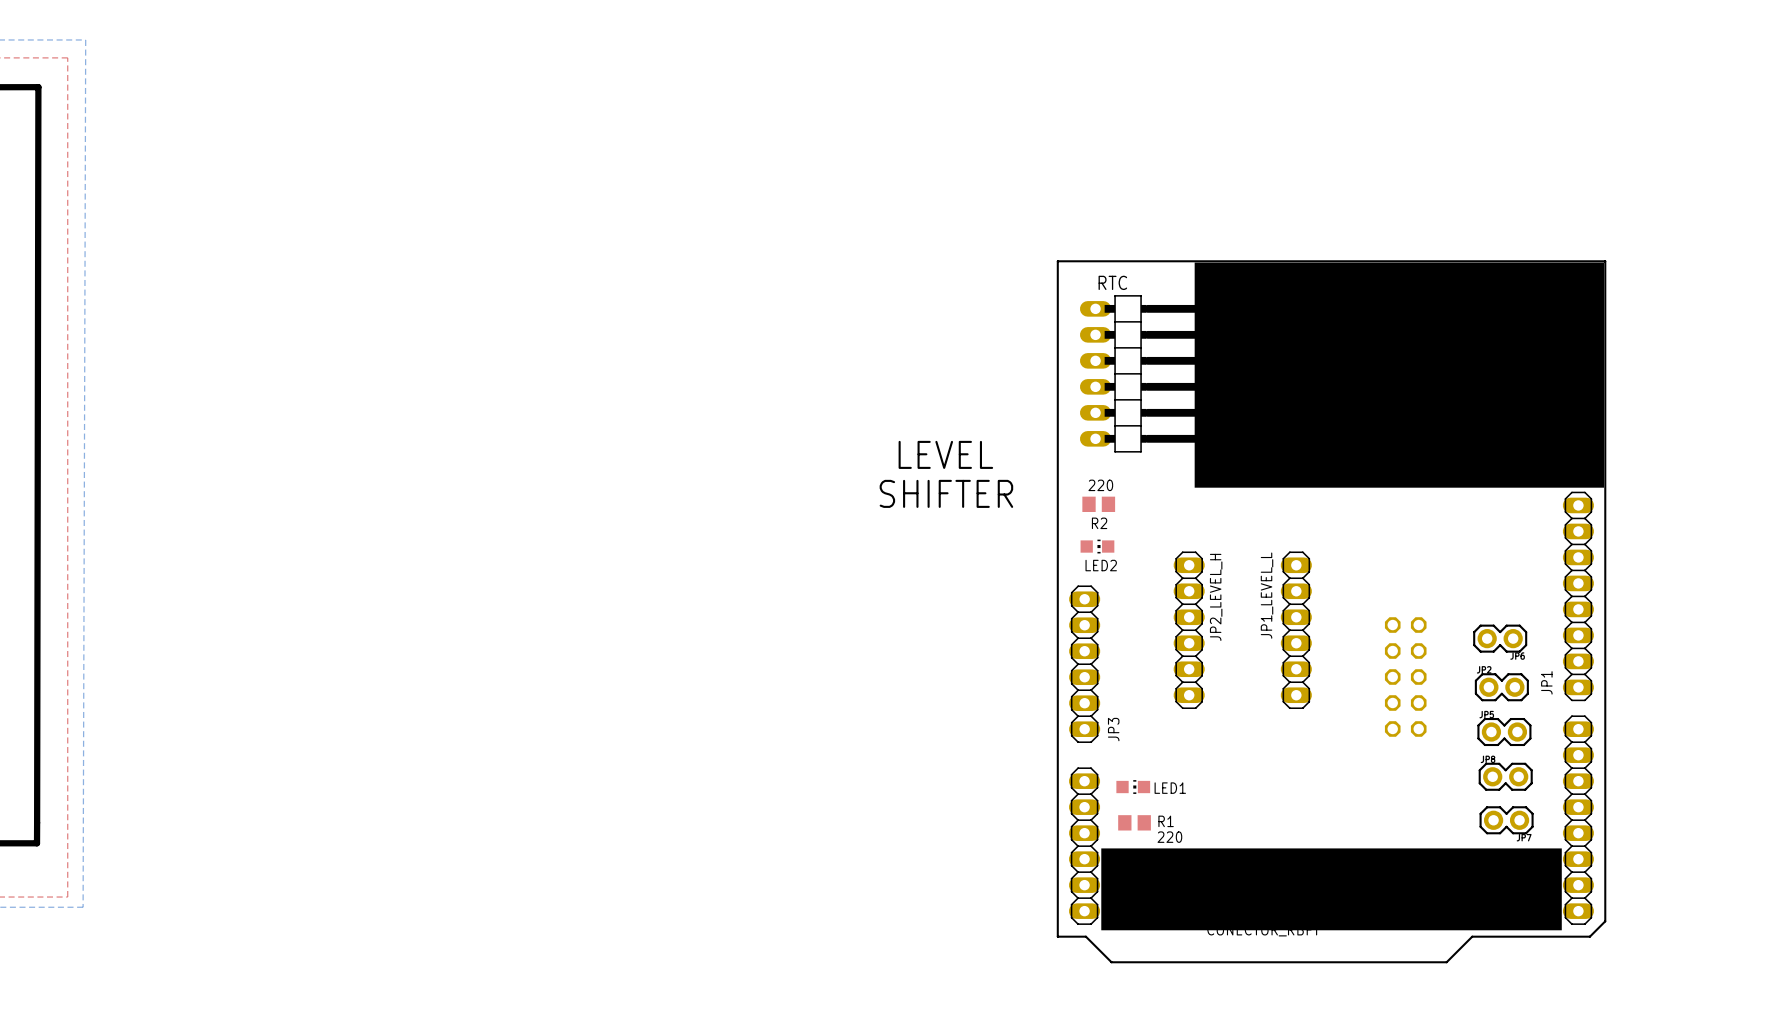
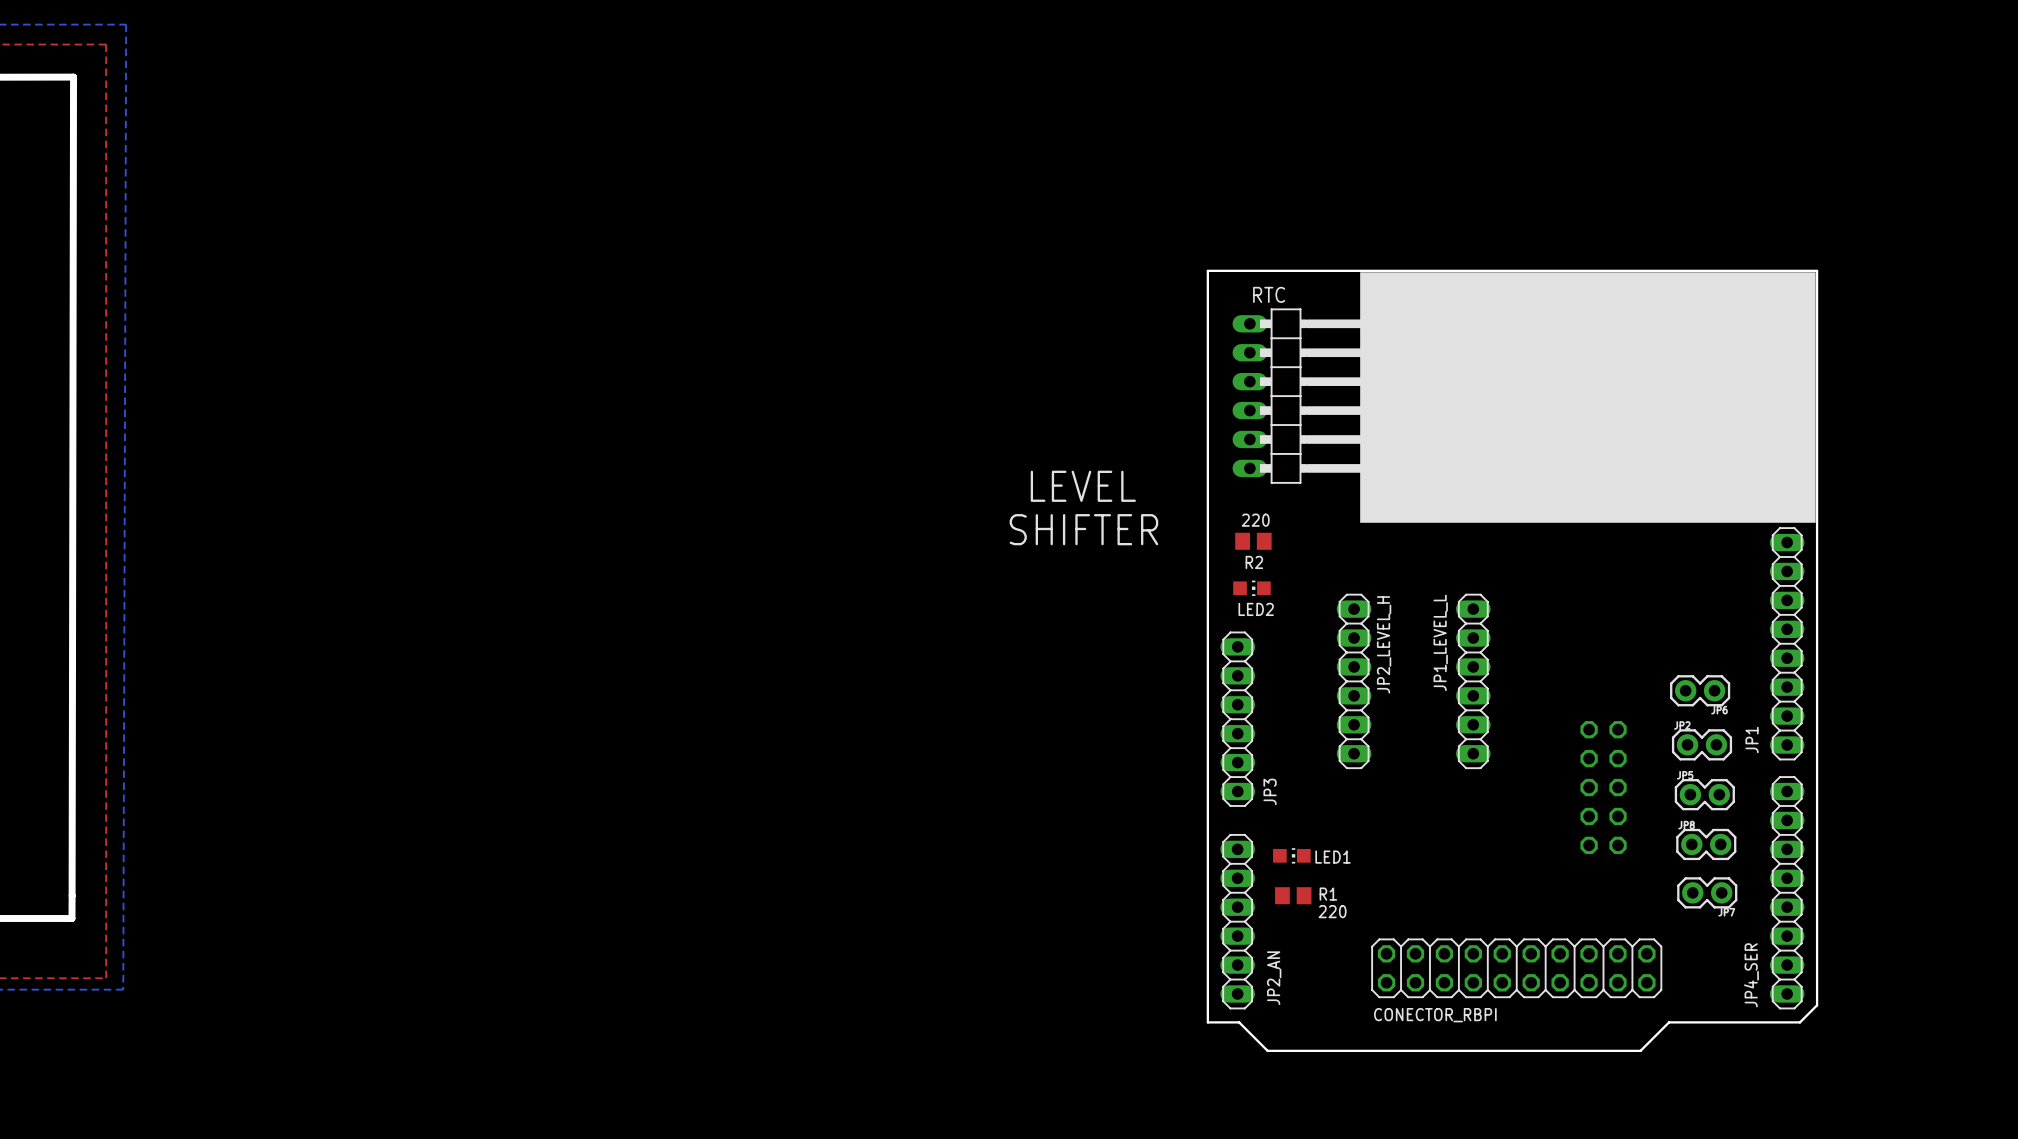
part position: (1405, 677) -> (1603, 787)
drawing: [1101, 848, 1562, 931] -> none

